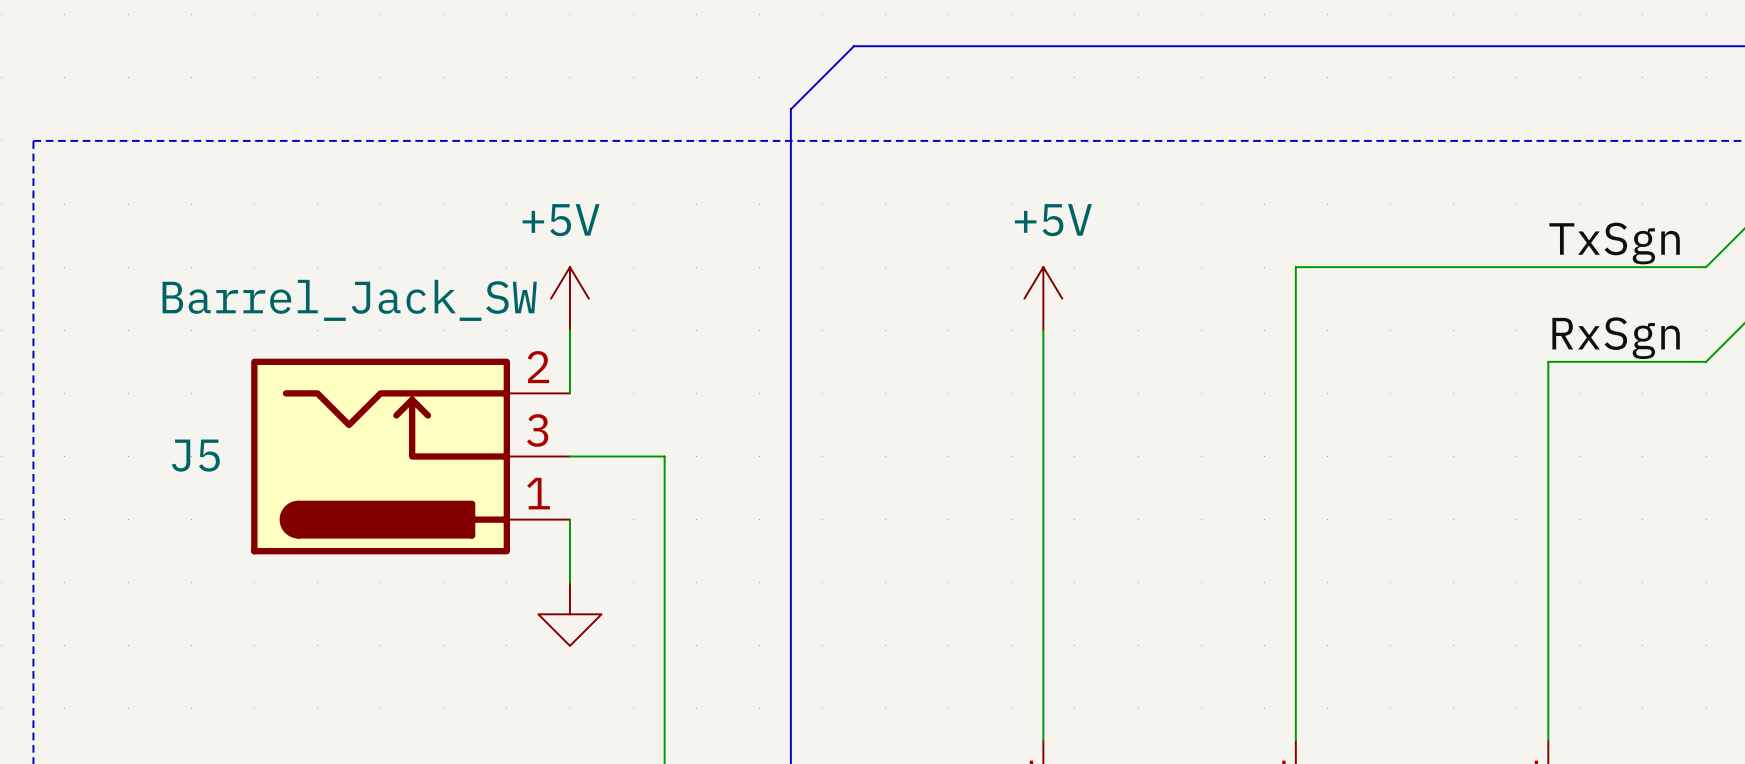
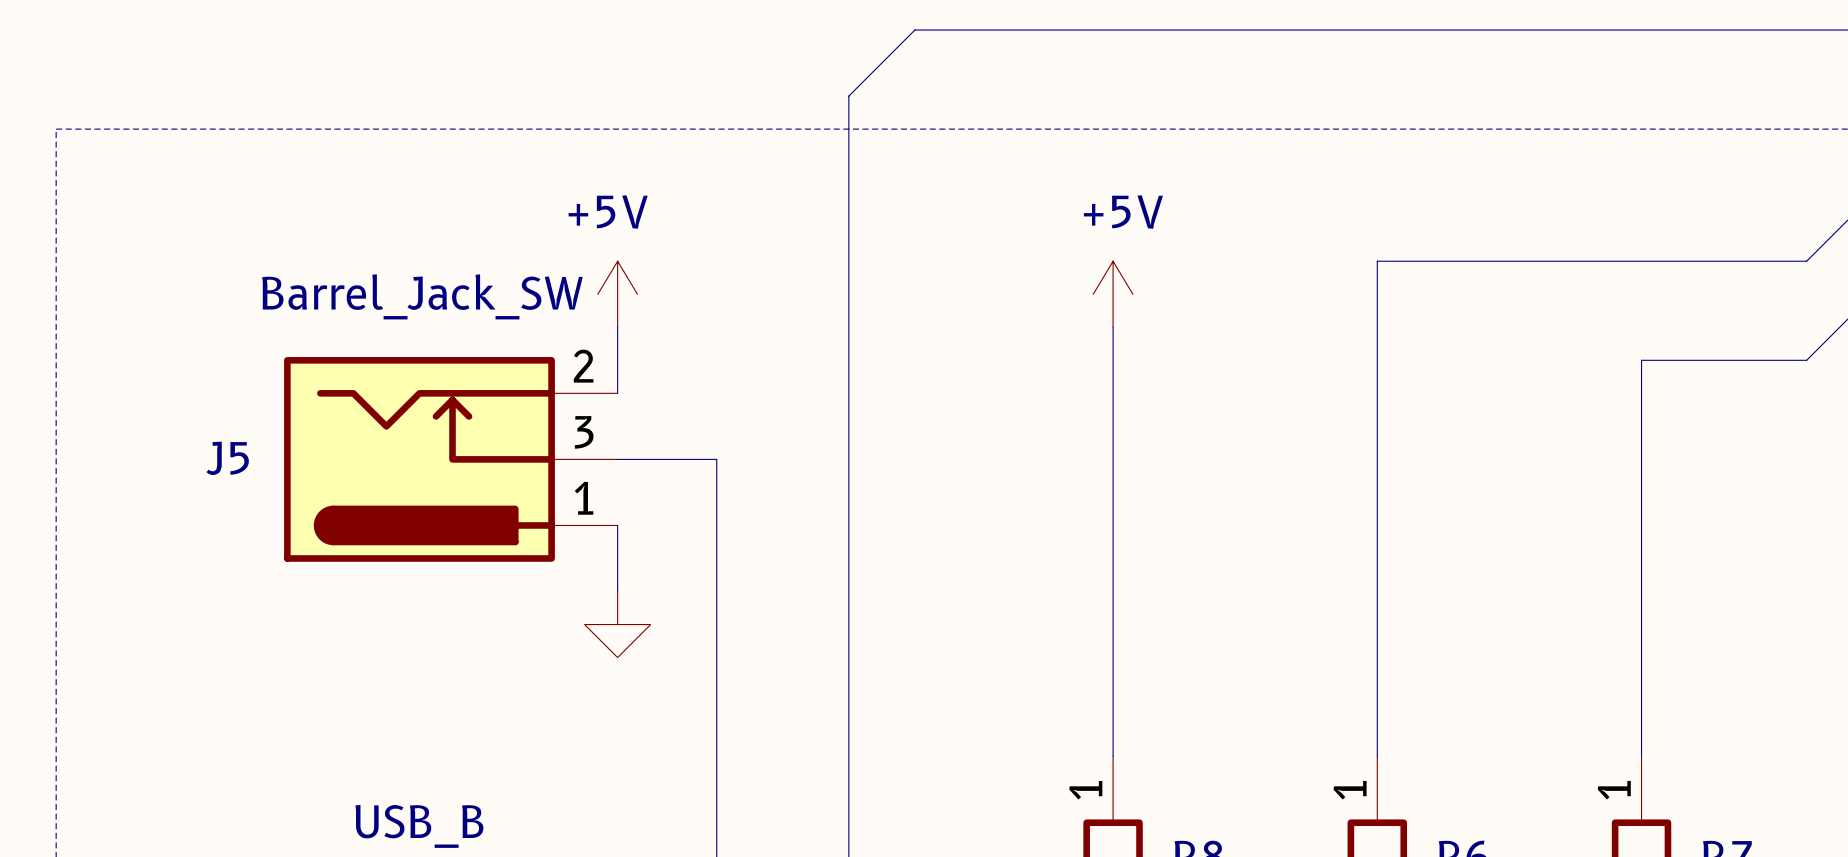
label: TxSgn (1614, 243) -> none
label: RxSgn (1616, 338) -> none

